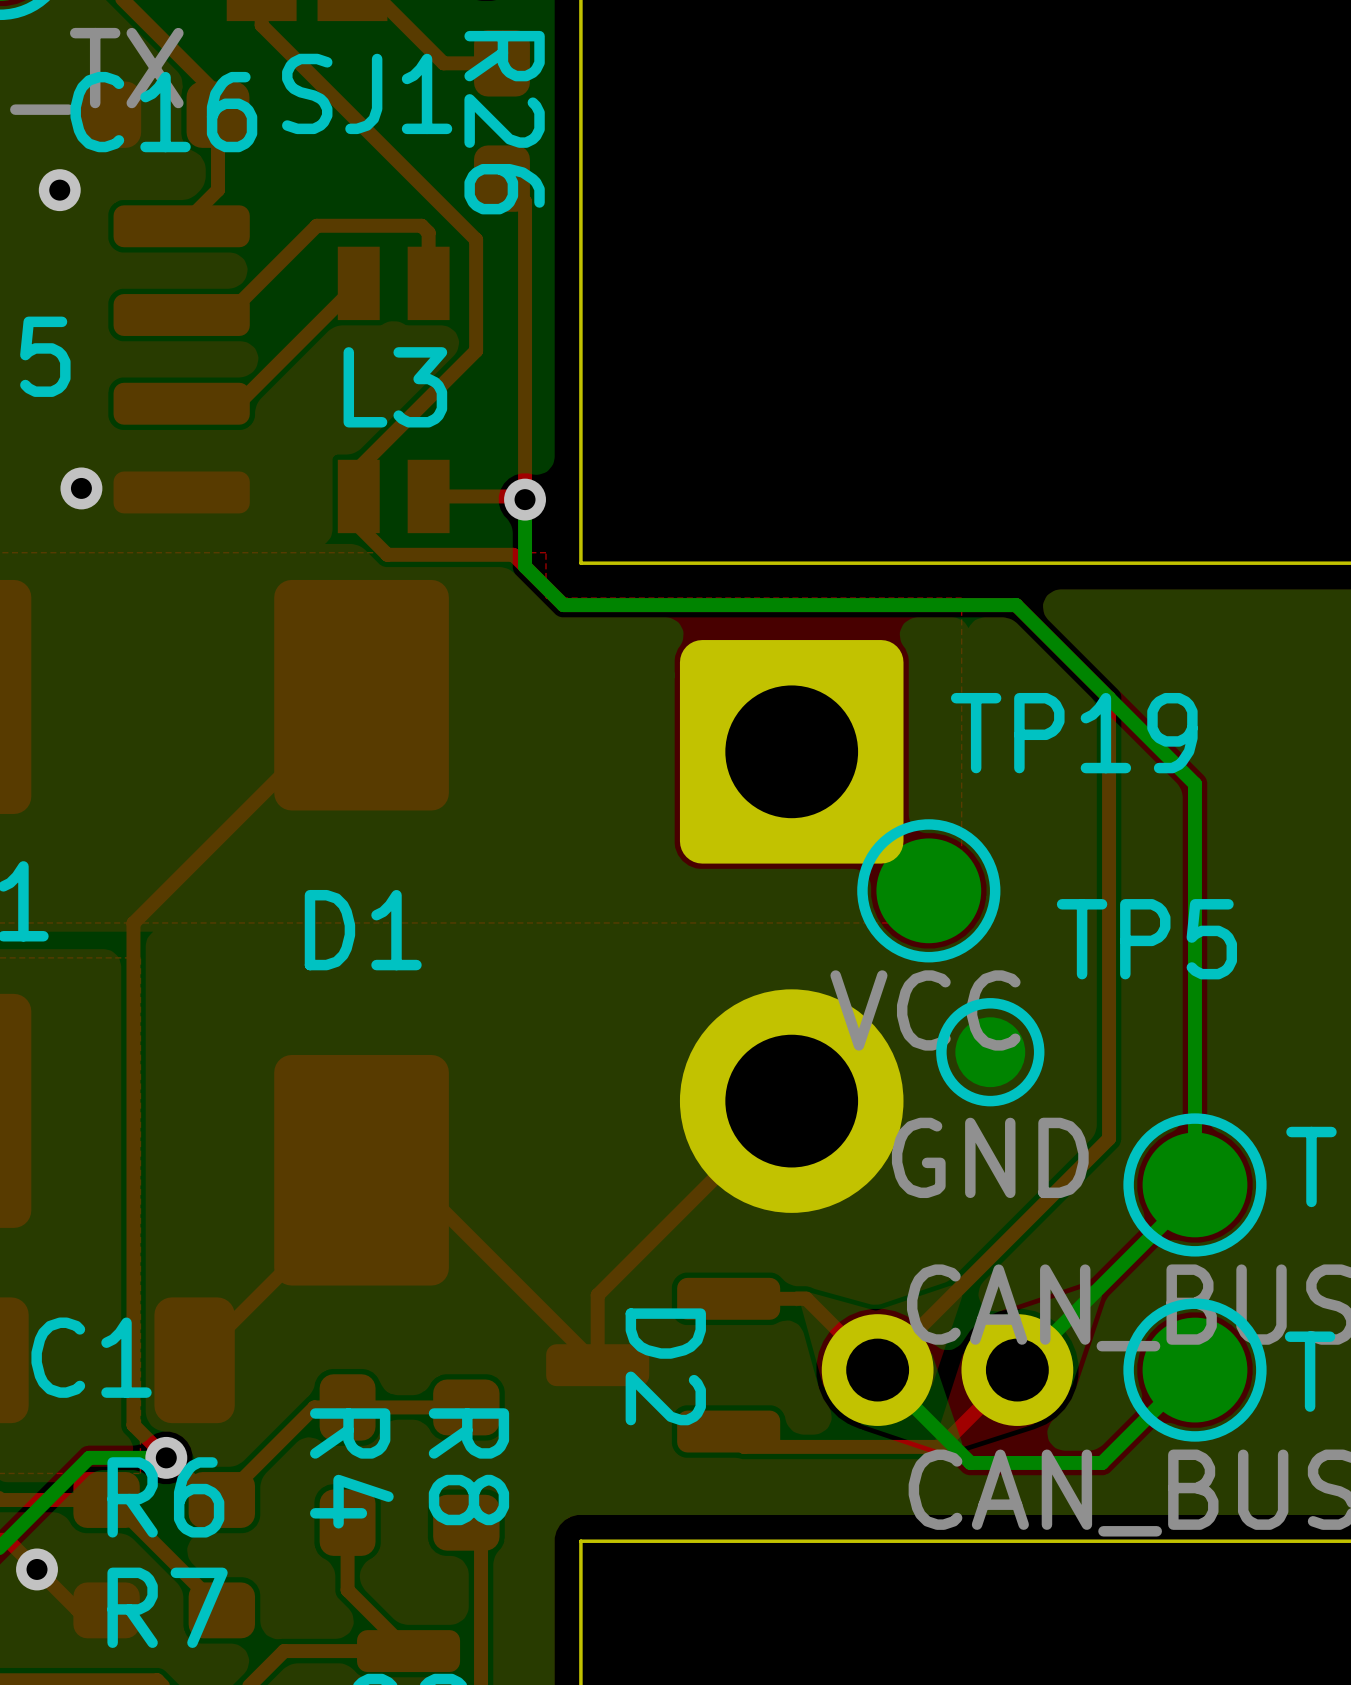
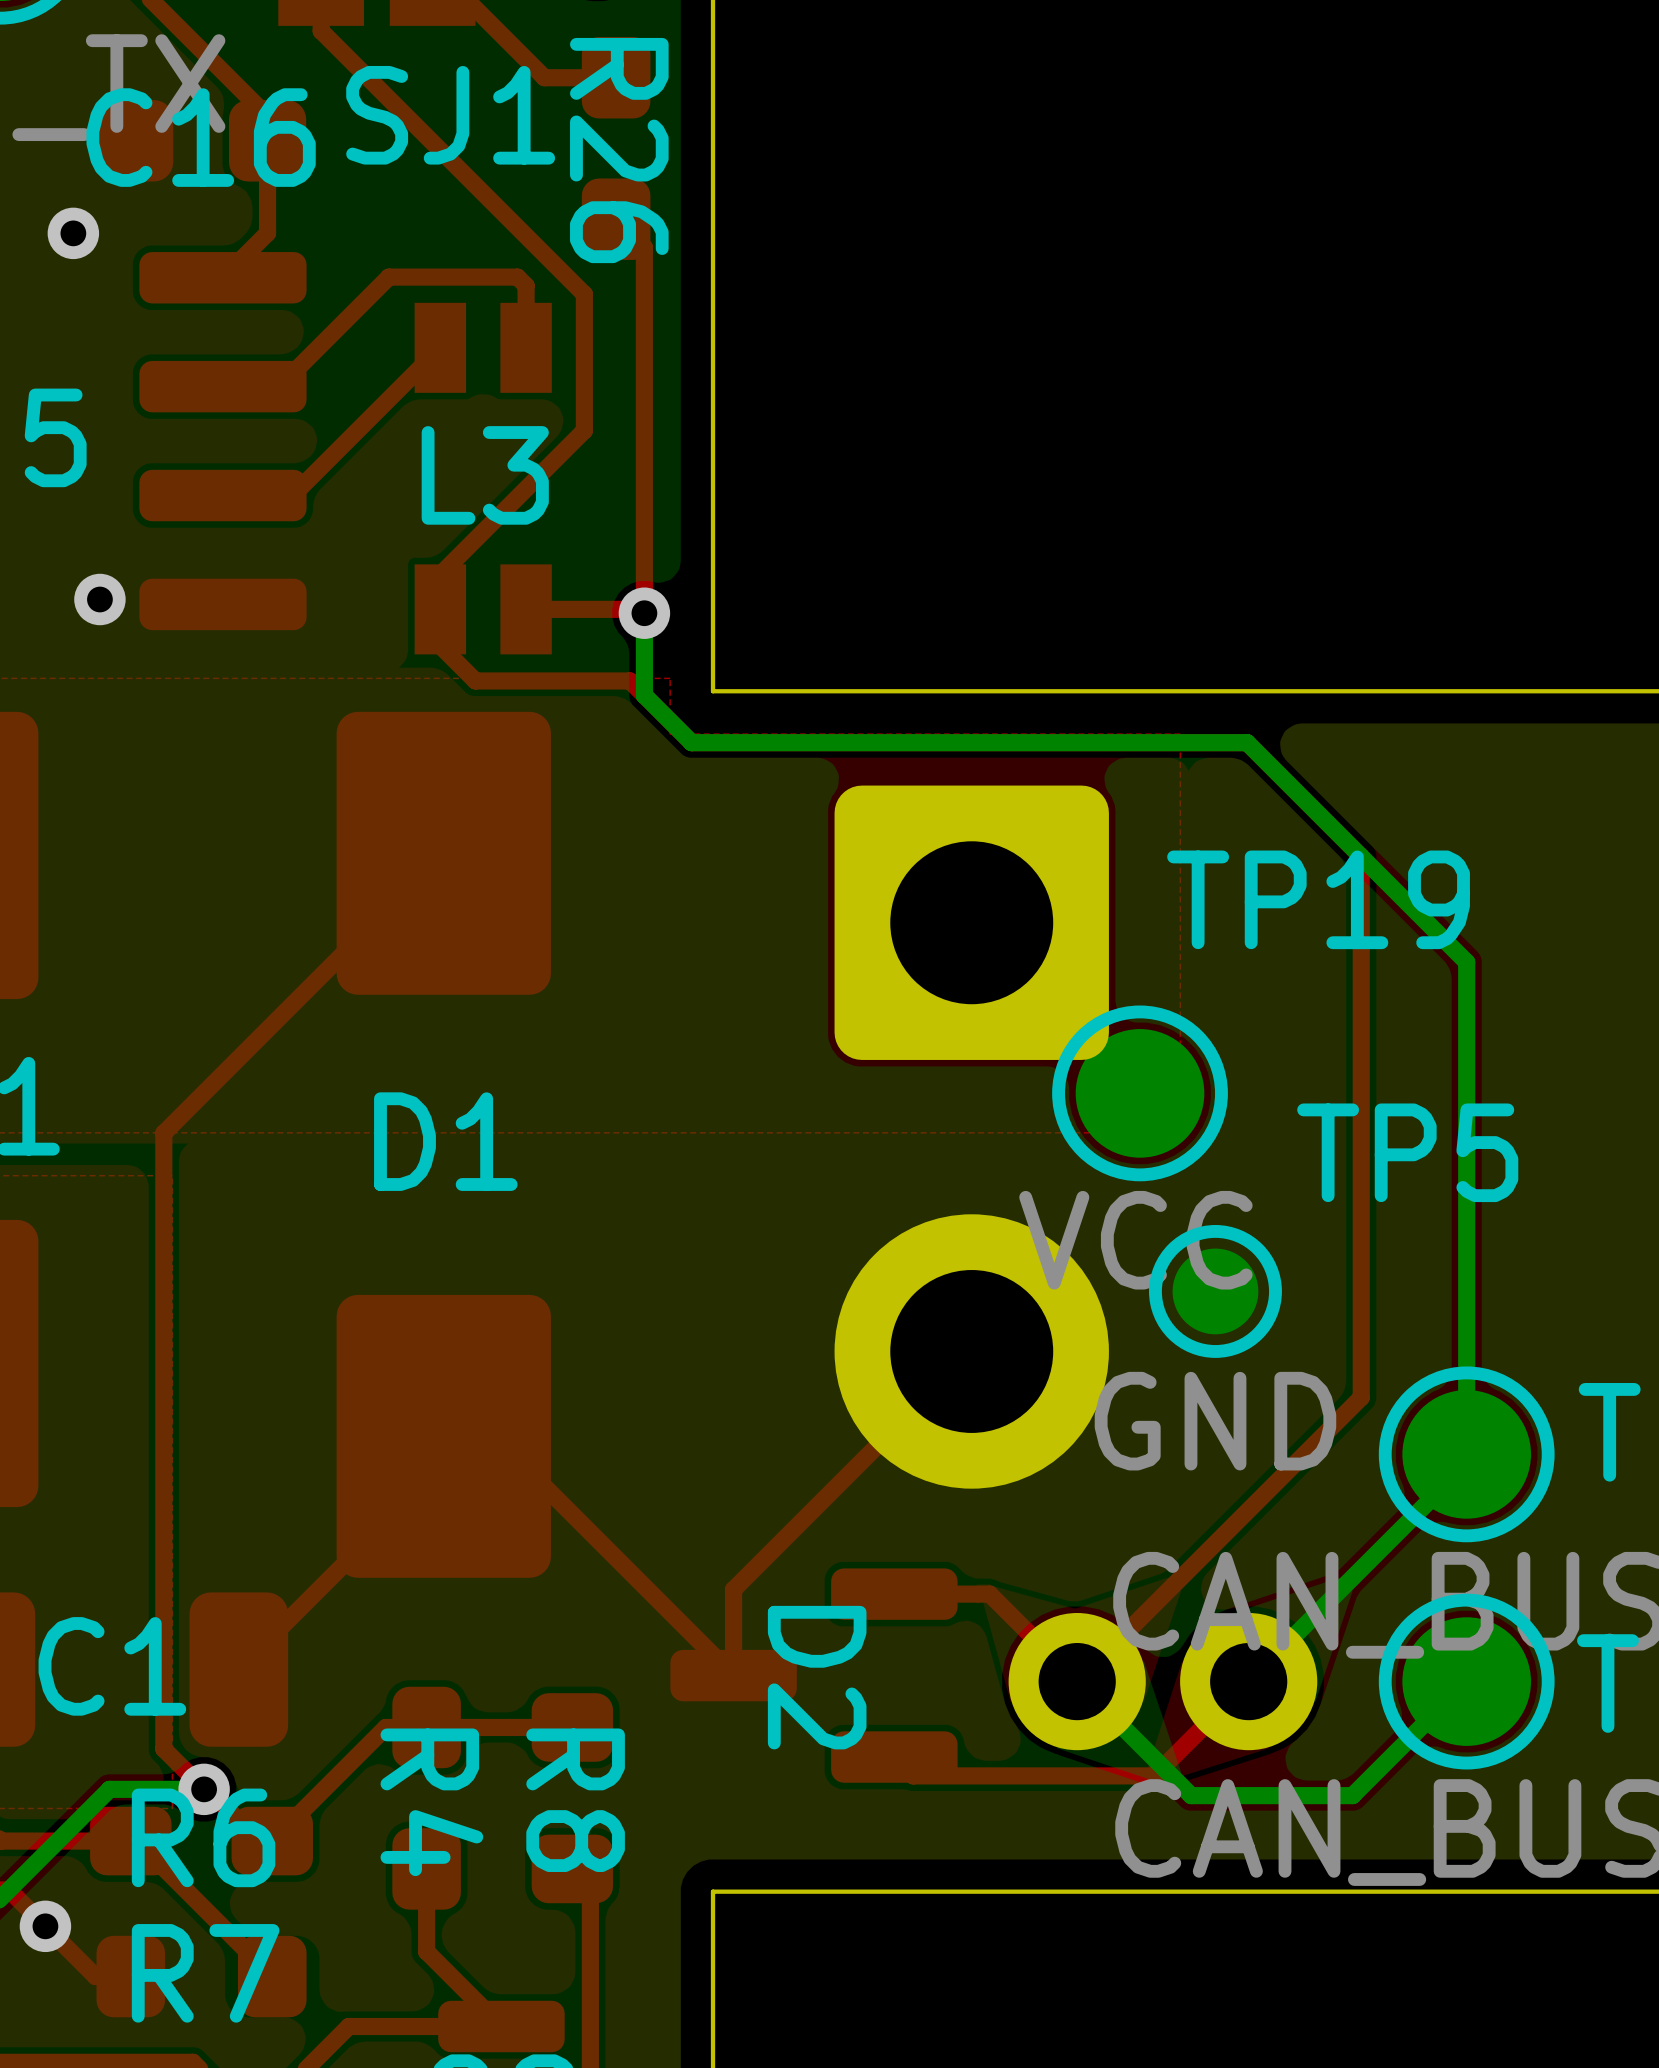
R7 footprint: [73, 1582, 256, 1639] -> [96, 1935, 307, 2018]

